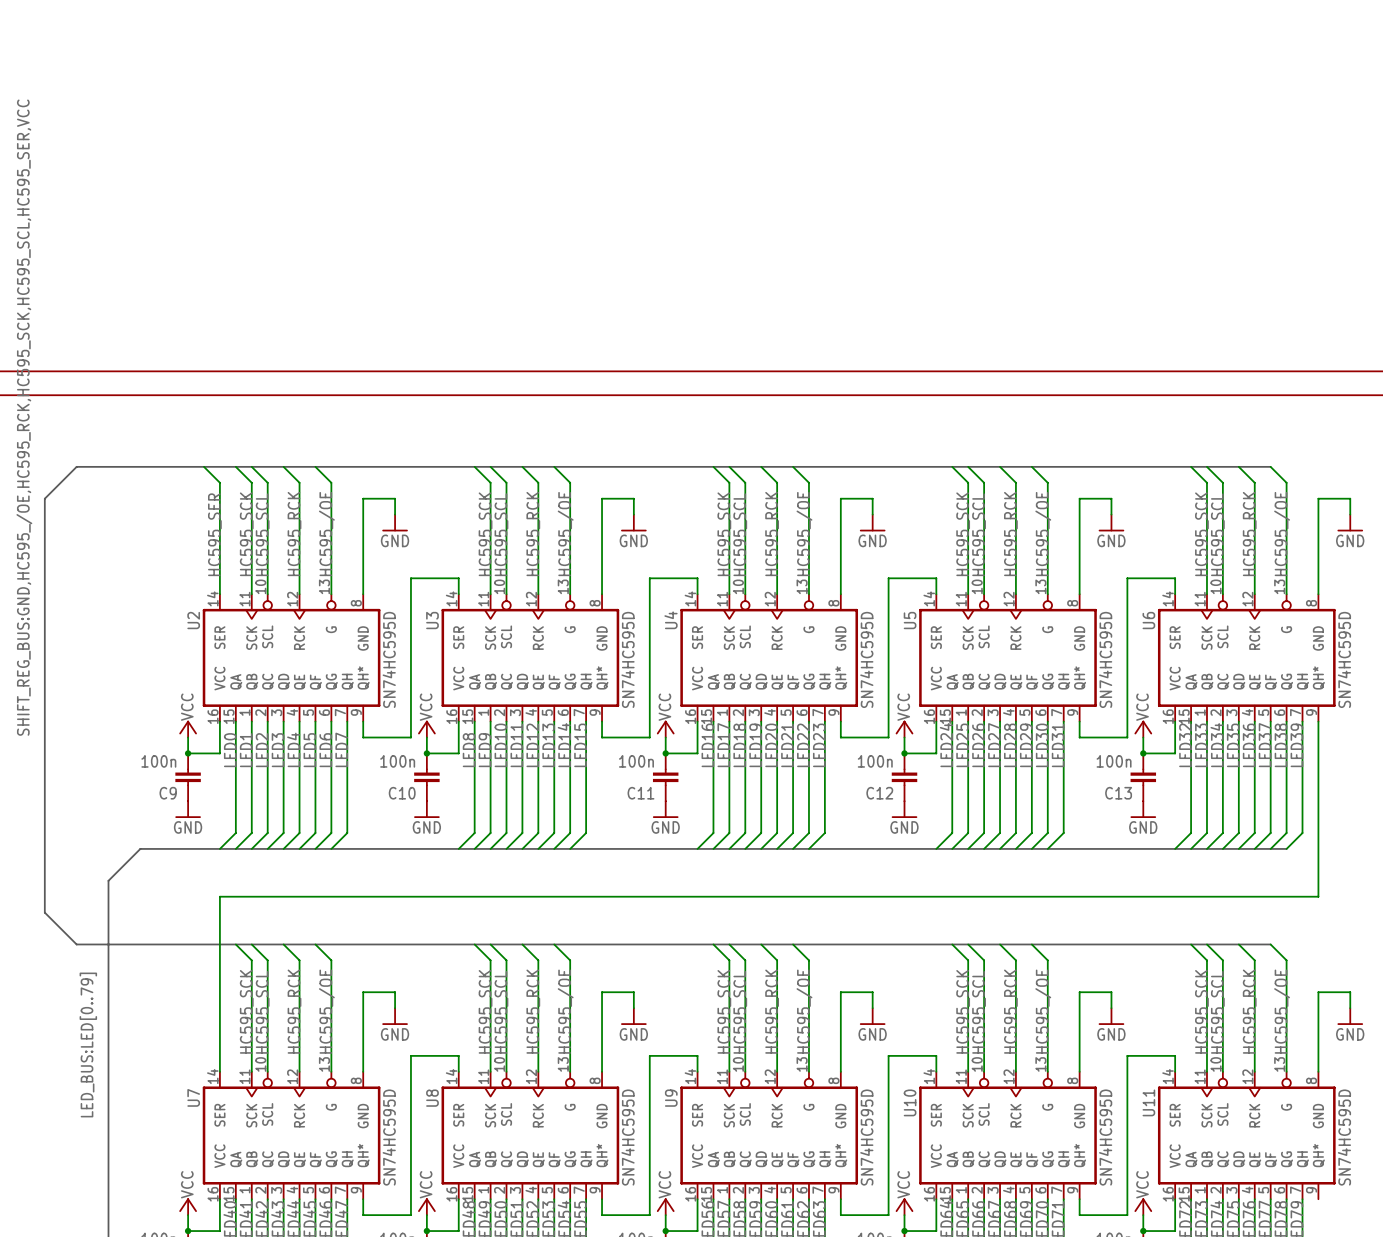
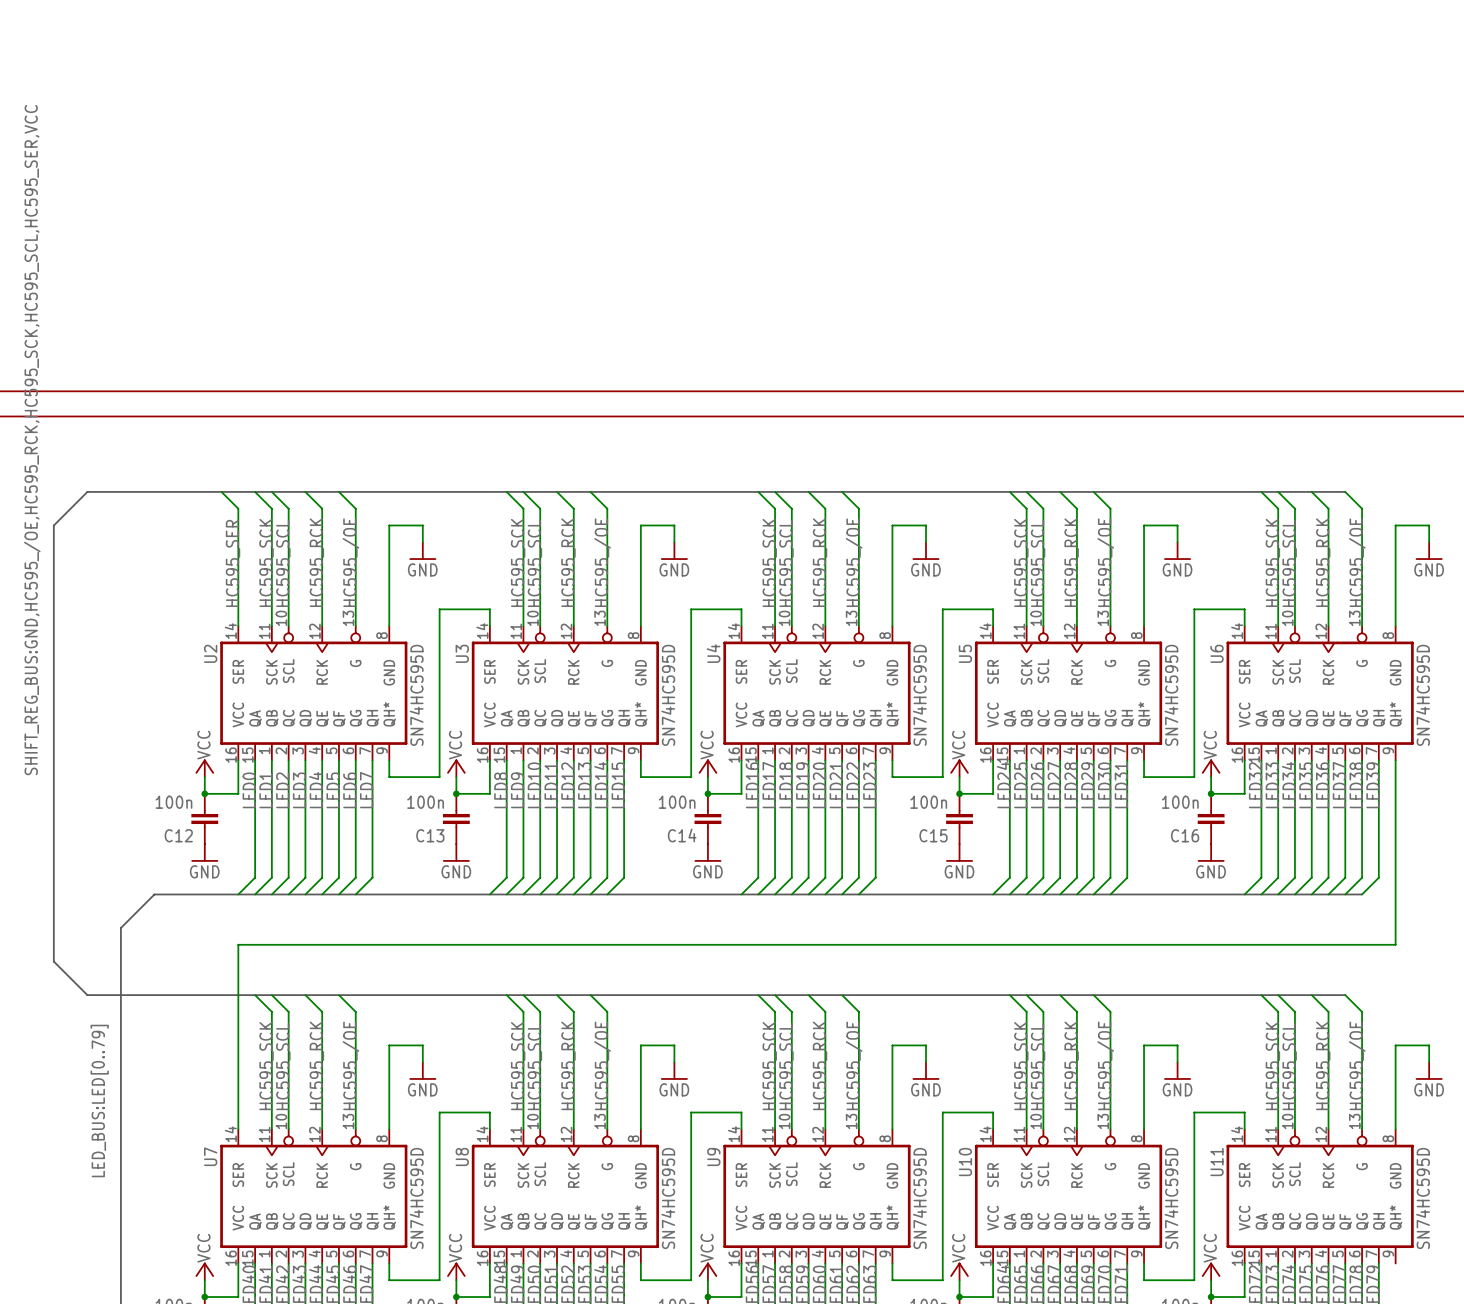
C9 name: C9 (168, 793) -> C12 (178, 835)
C10 name: C10 (402, 793) -> C13 (430, 835)
C11 name: C11 (640, 793) -> C14 (682, 835)
C12 name: C12 (879, 793) -> C15 (933, 835)
C13 name: C13 (1118, 793) -> C16 (1185, 835)

